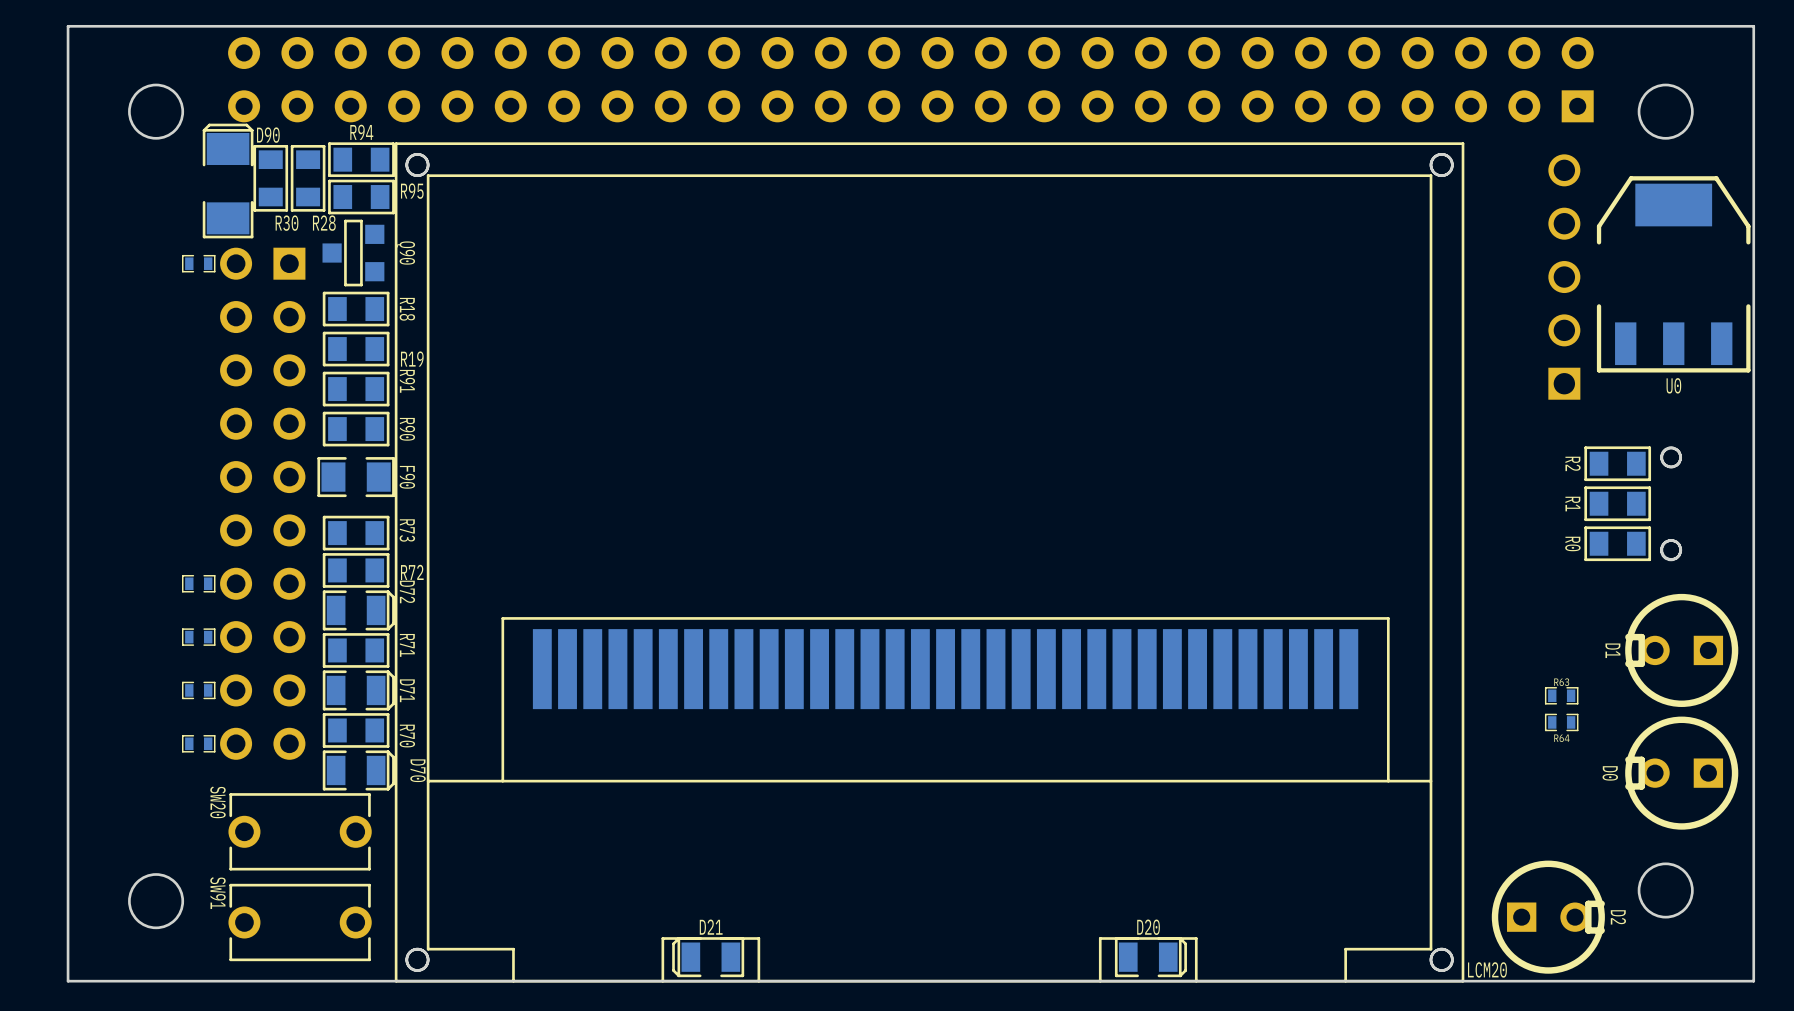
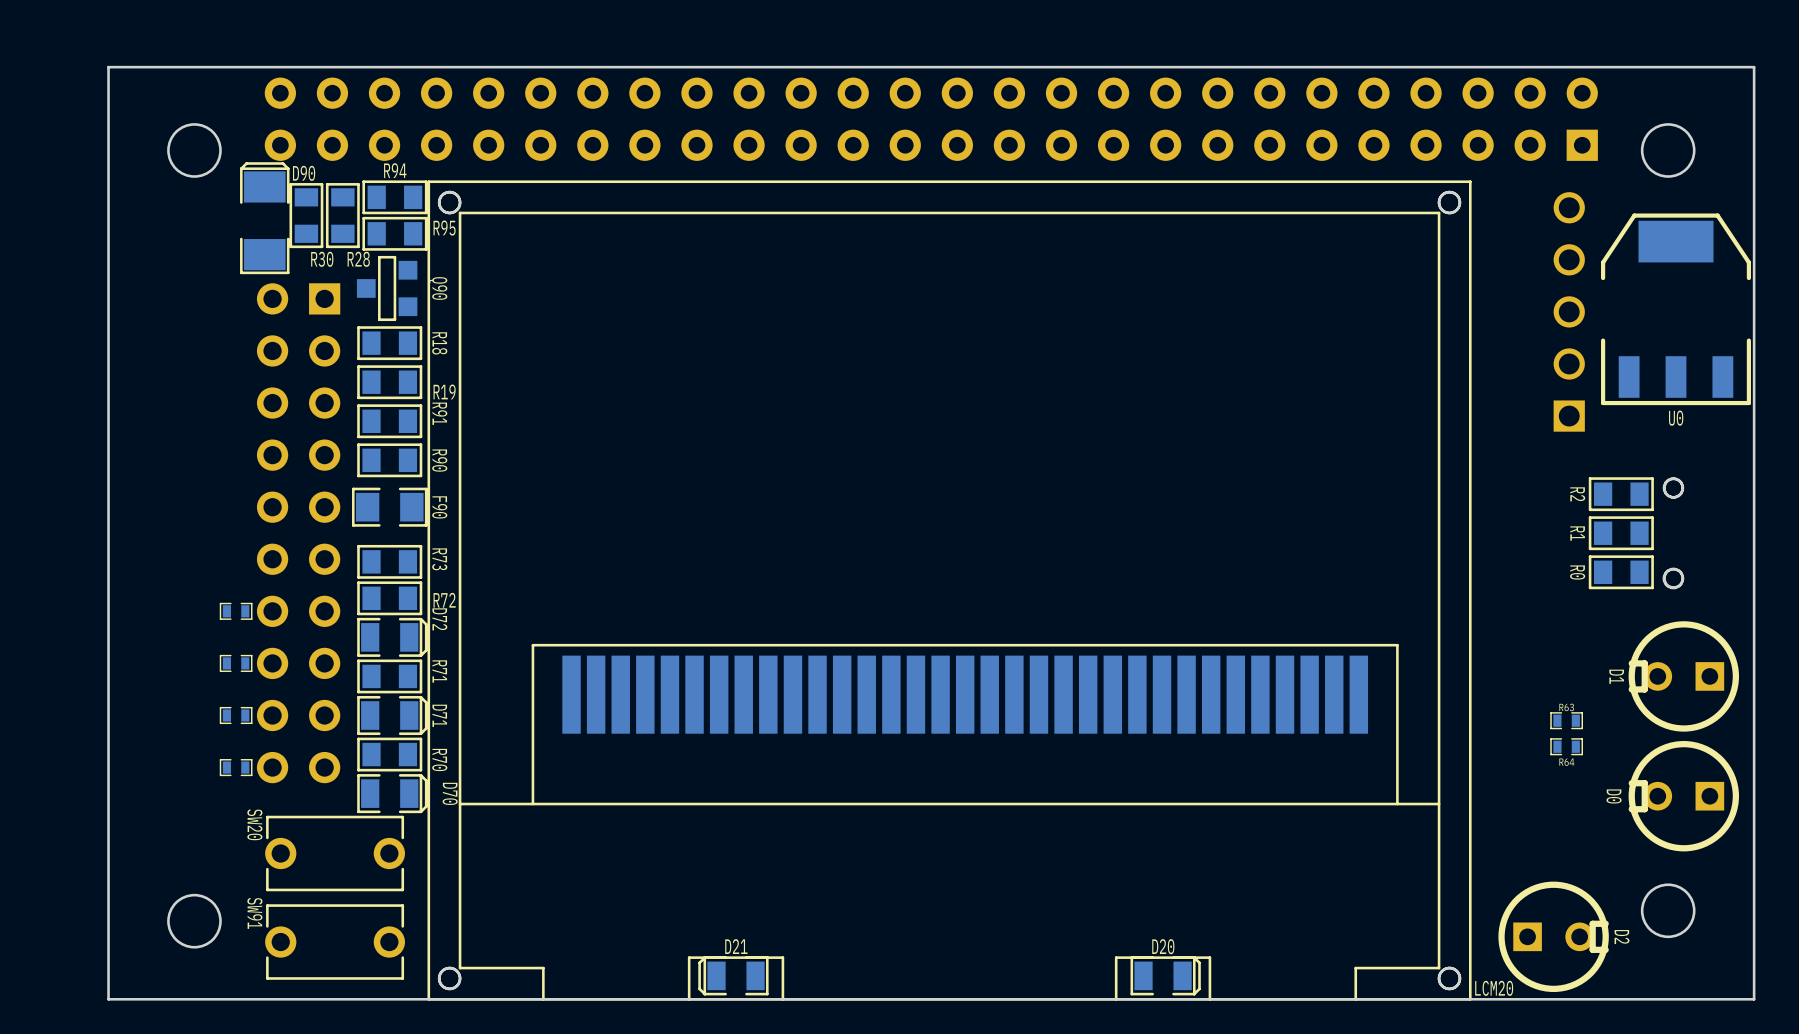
part: (198, 263) -> none

